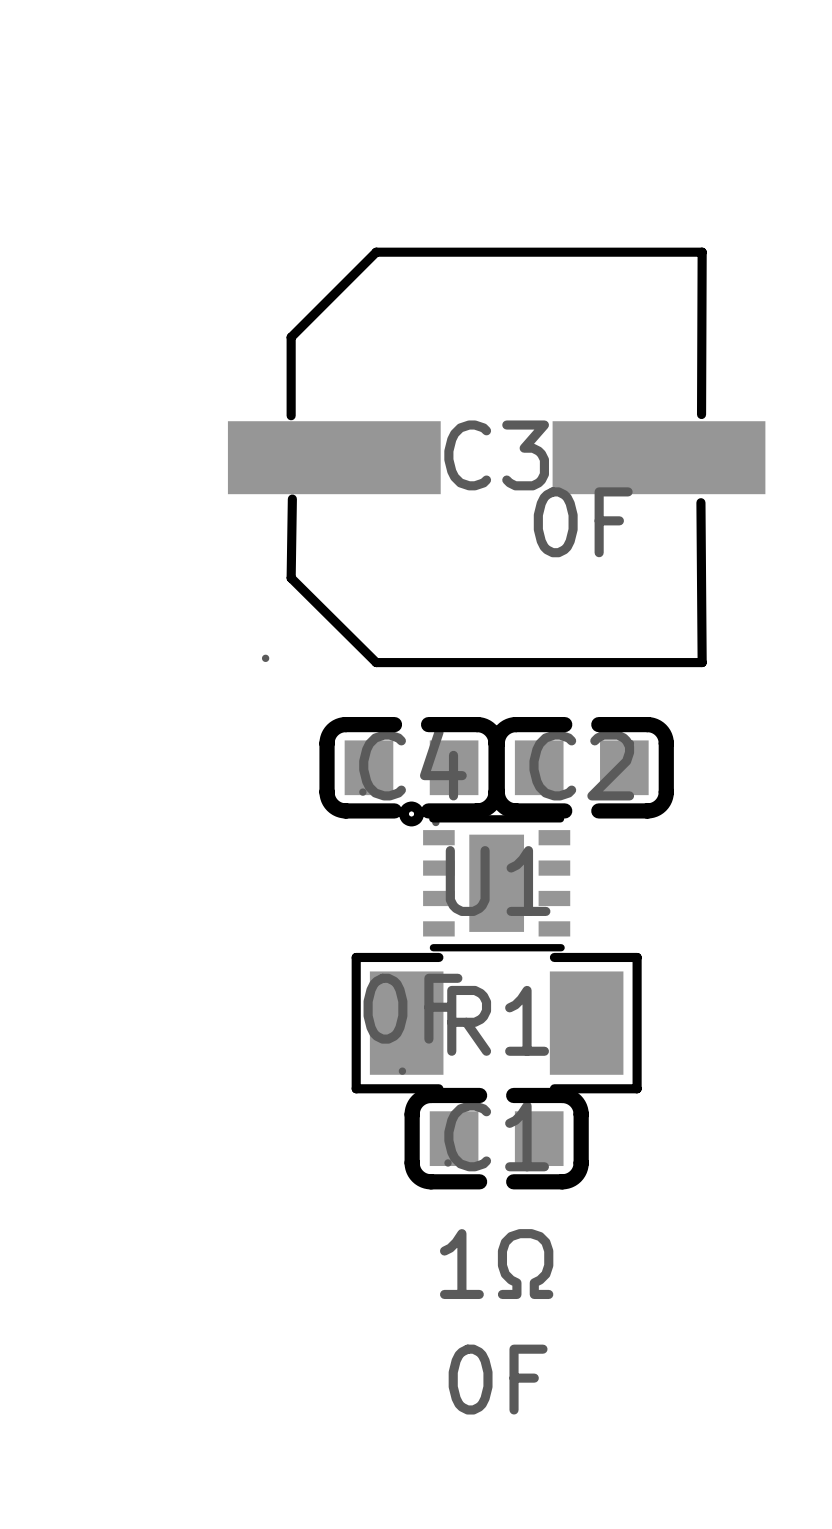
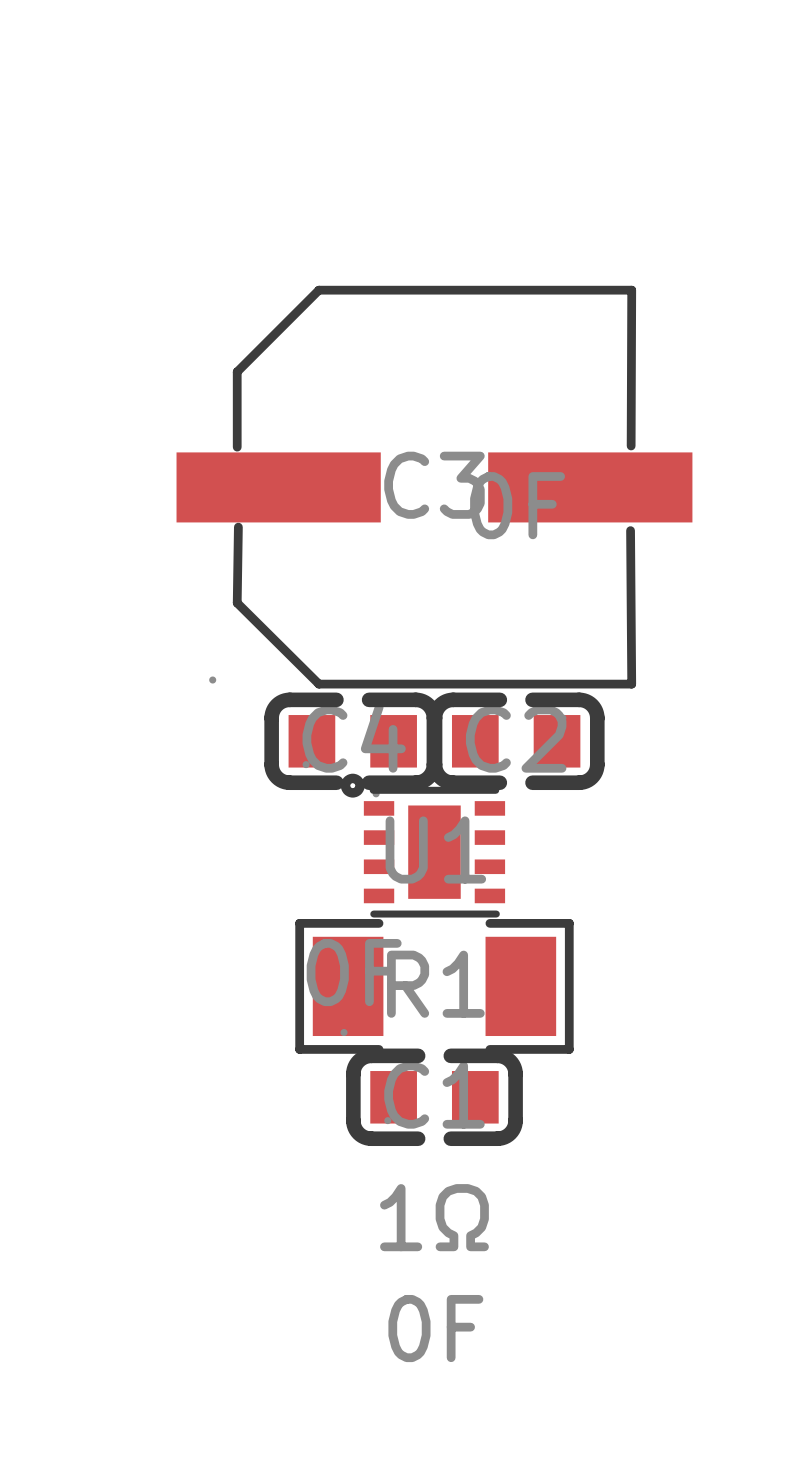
C3 position: (496, 457) -> (434, 487)

